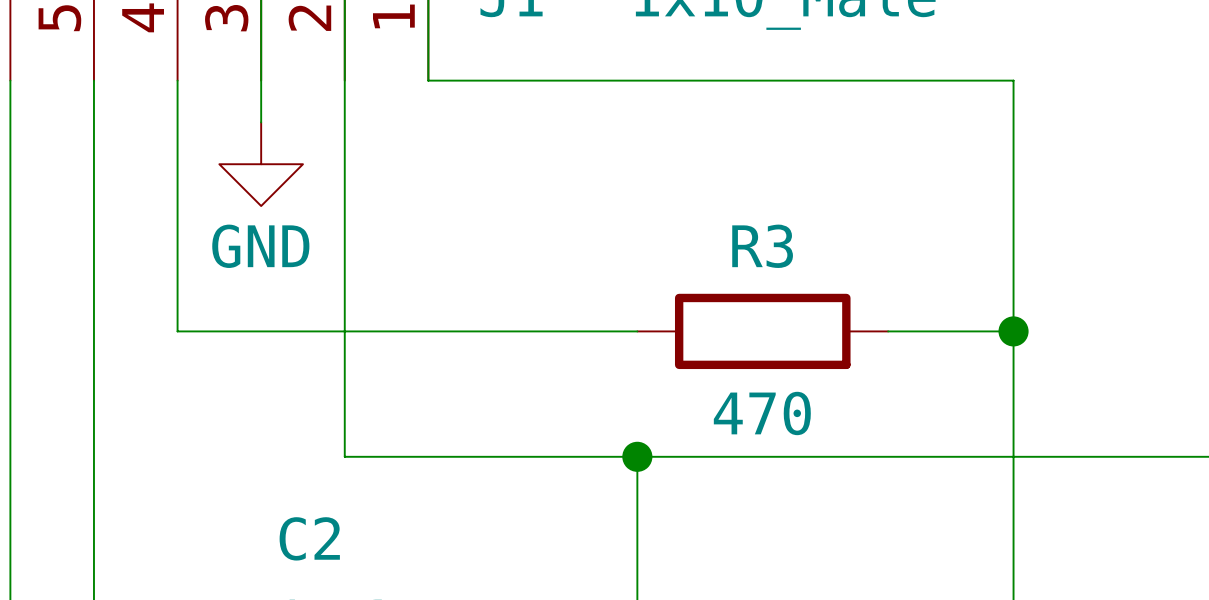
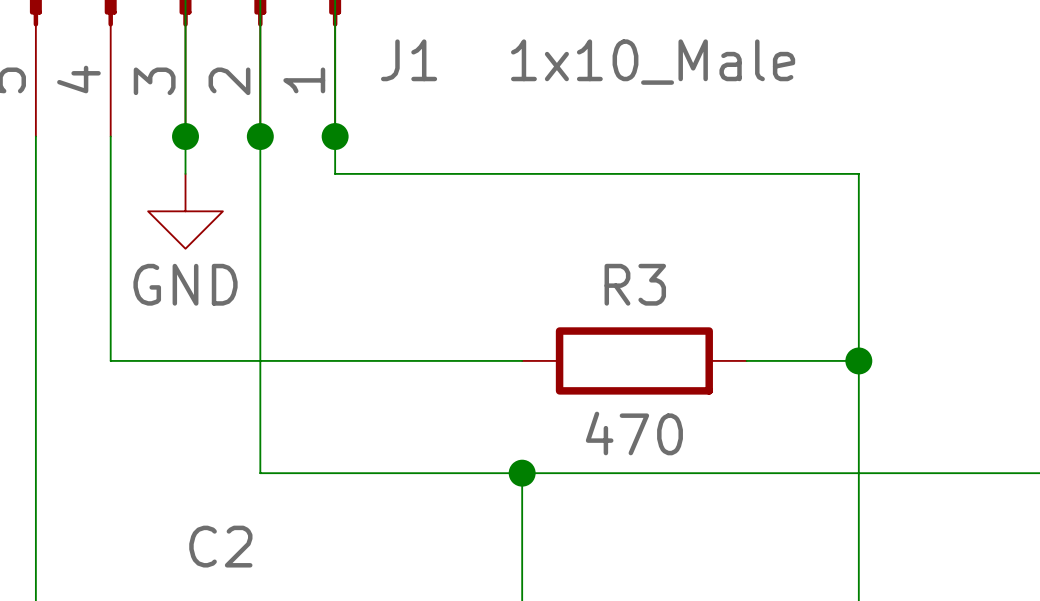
junction: none -> (185, 136)
junction: none -> (260, 136)
wire: (428, 80) (1013, 80) (1013, 122) -> (335, 136) (335, 173) (858, 173)
junction: none -> (335, 136)

